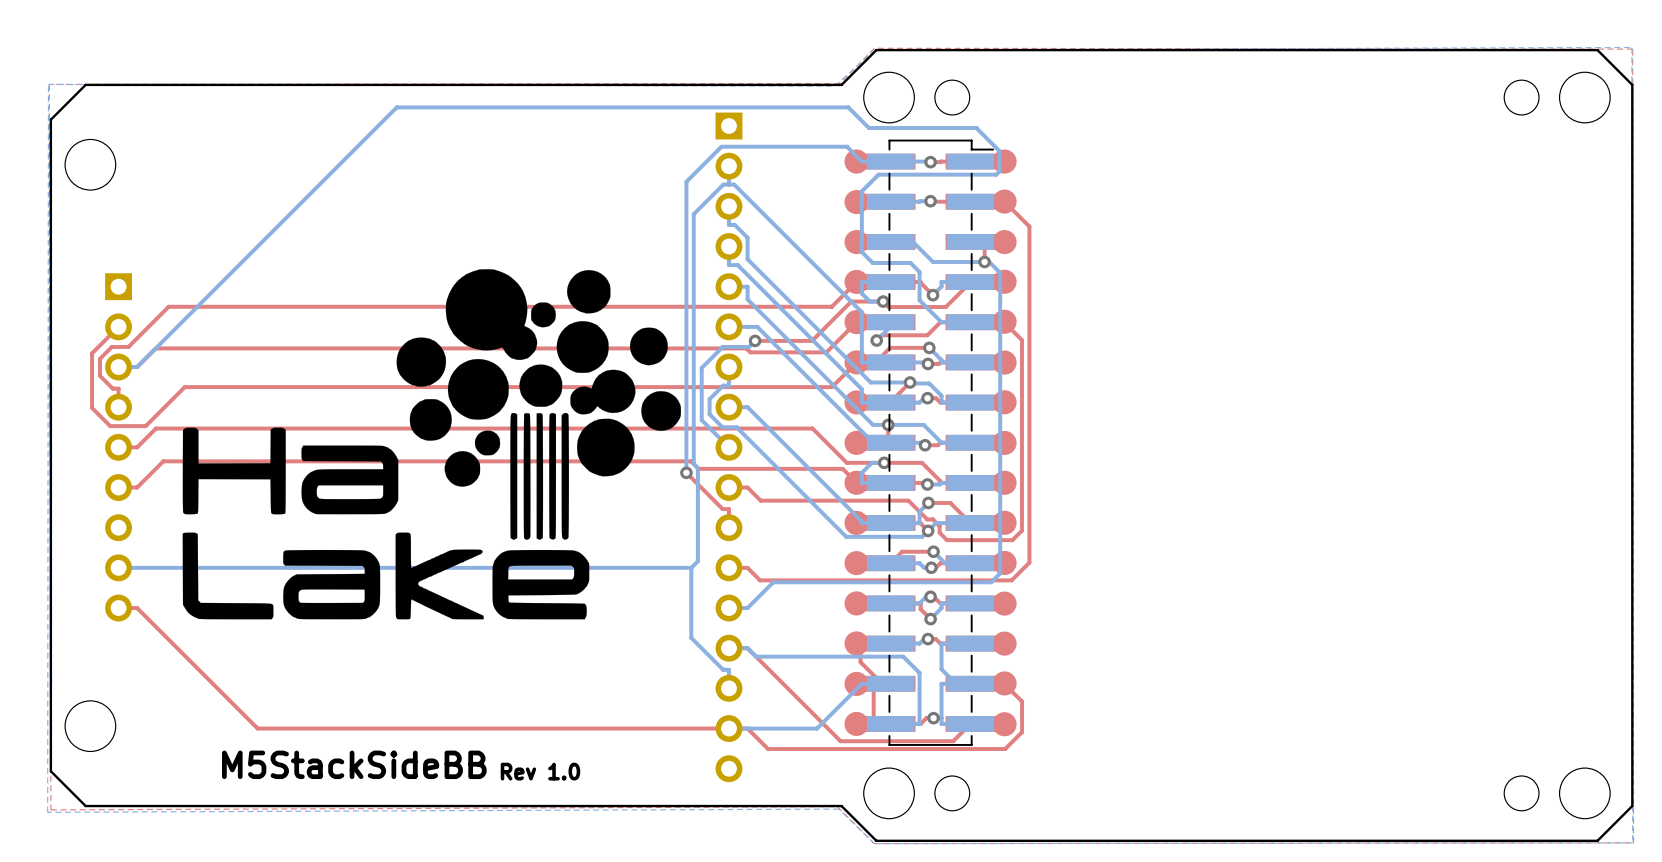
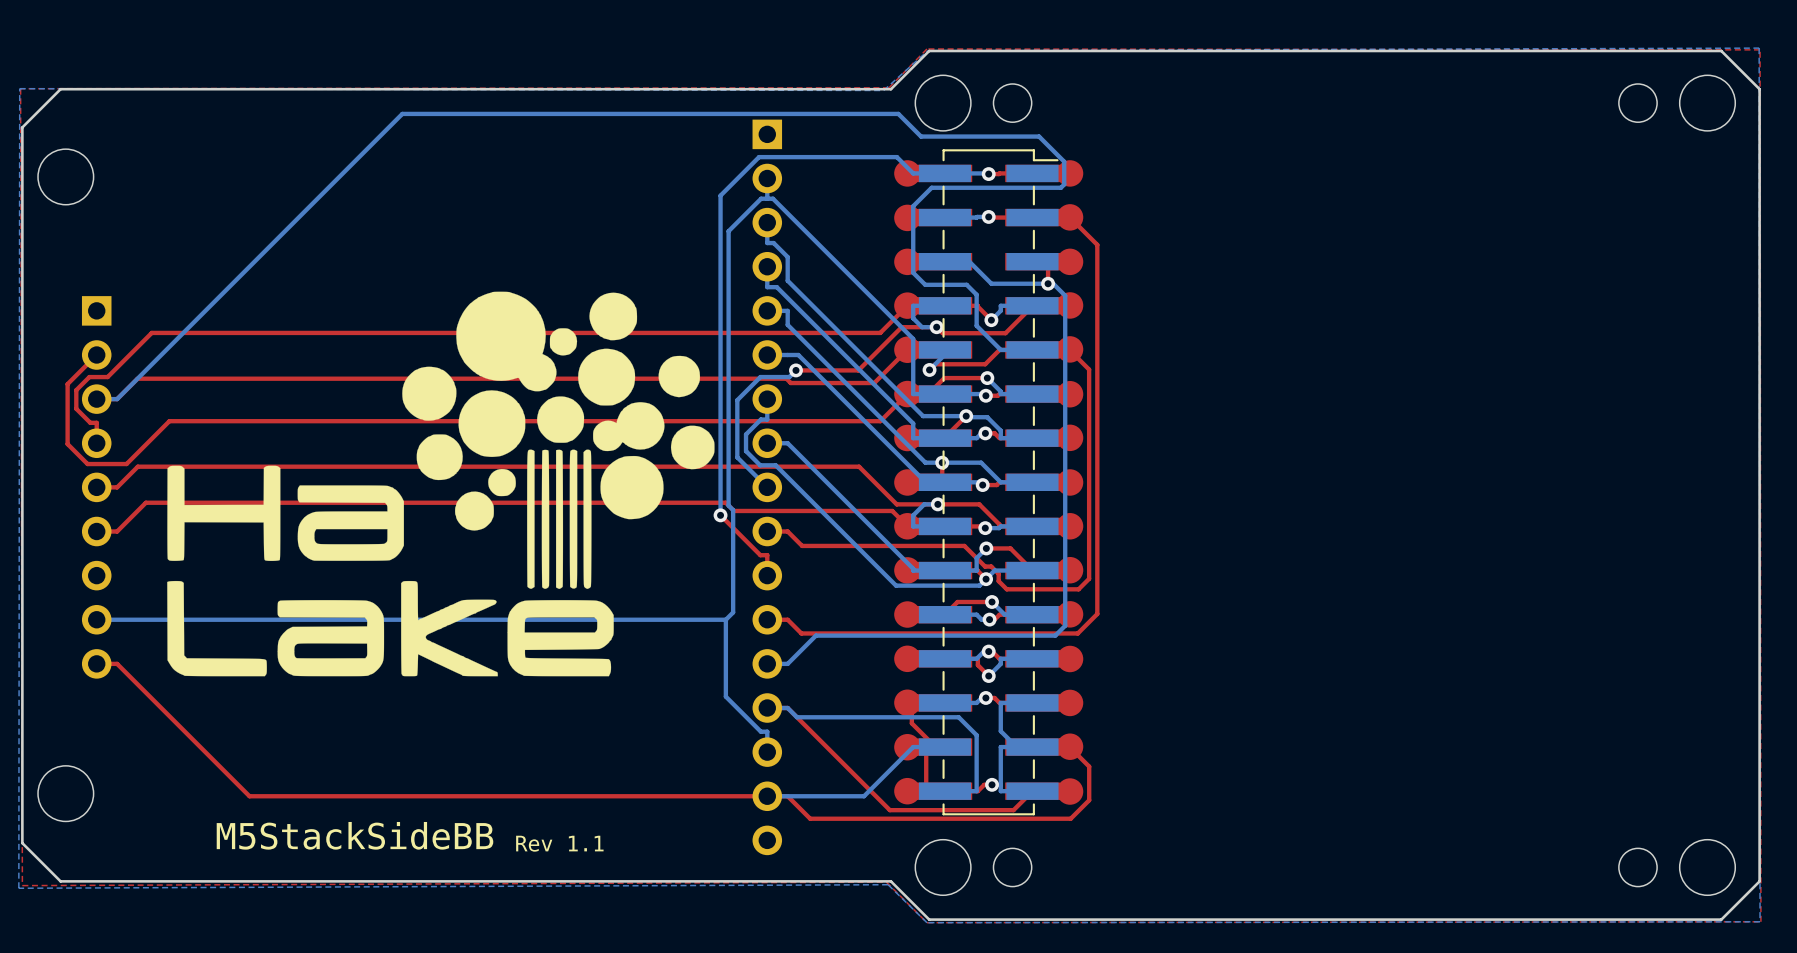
text: Rev 1.0 (540, 771) -> Rev 1.1 (559, 843)

